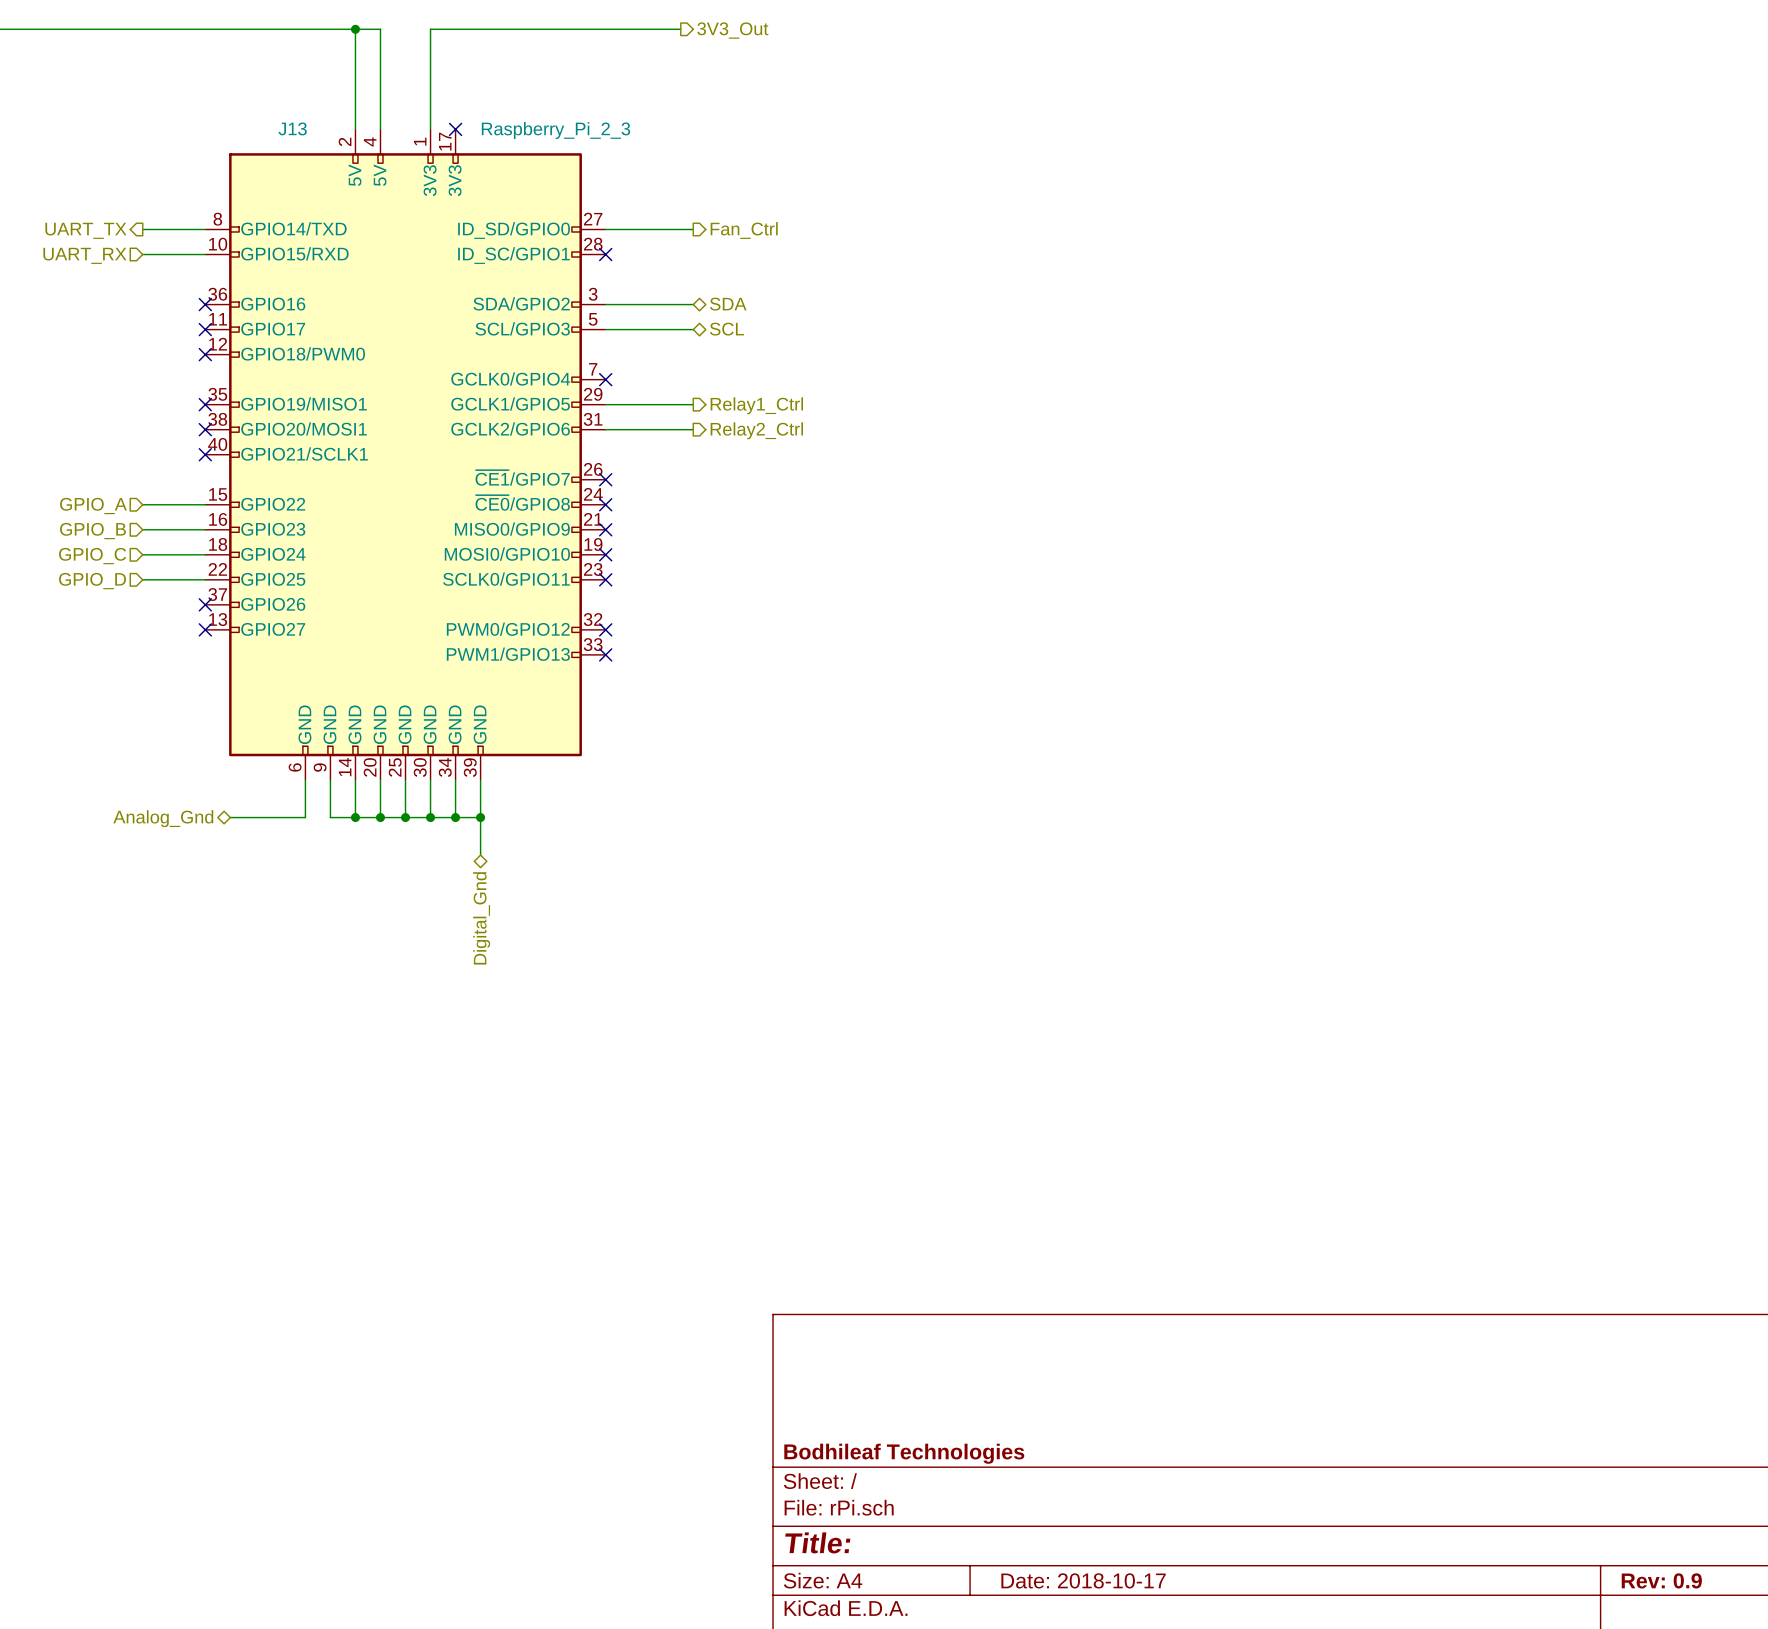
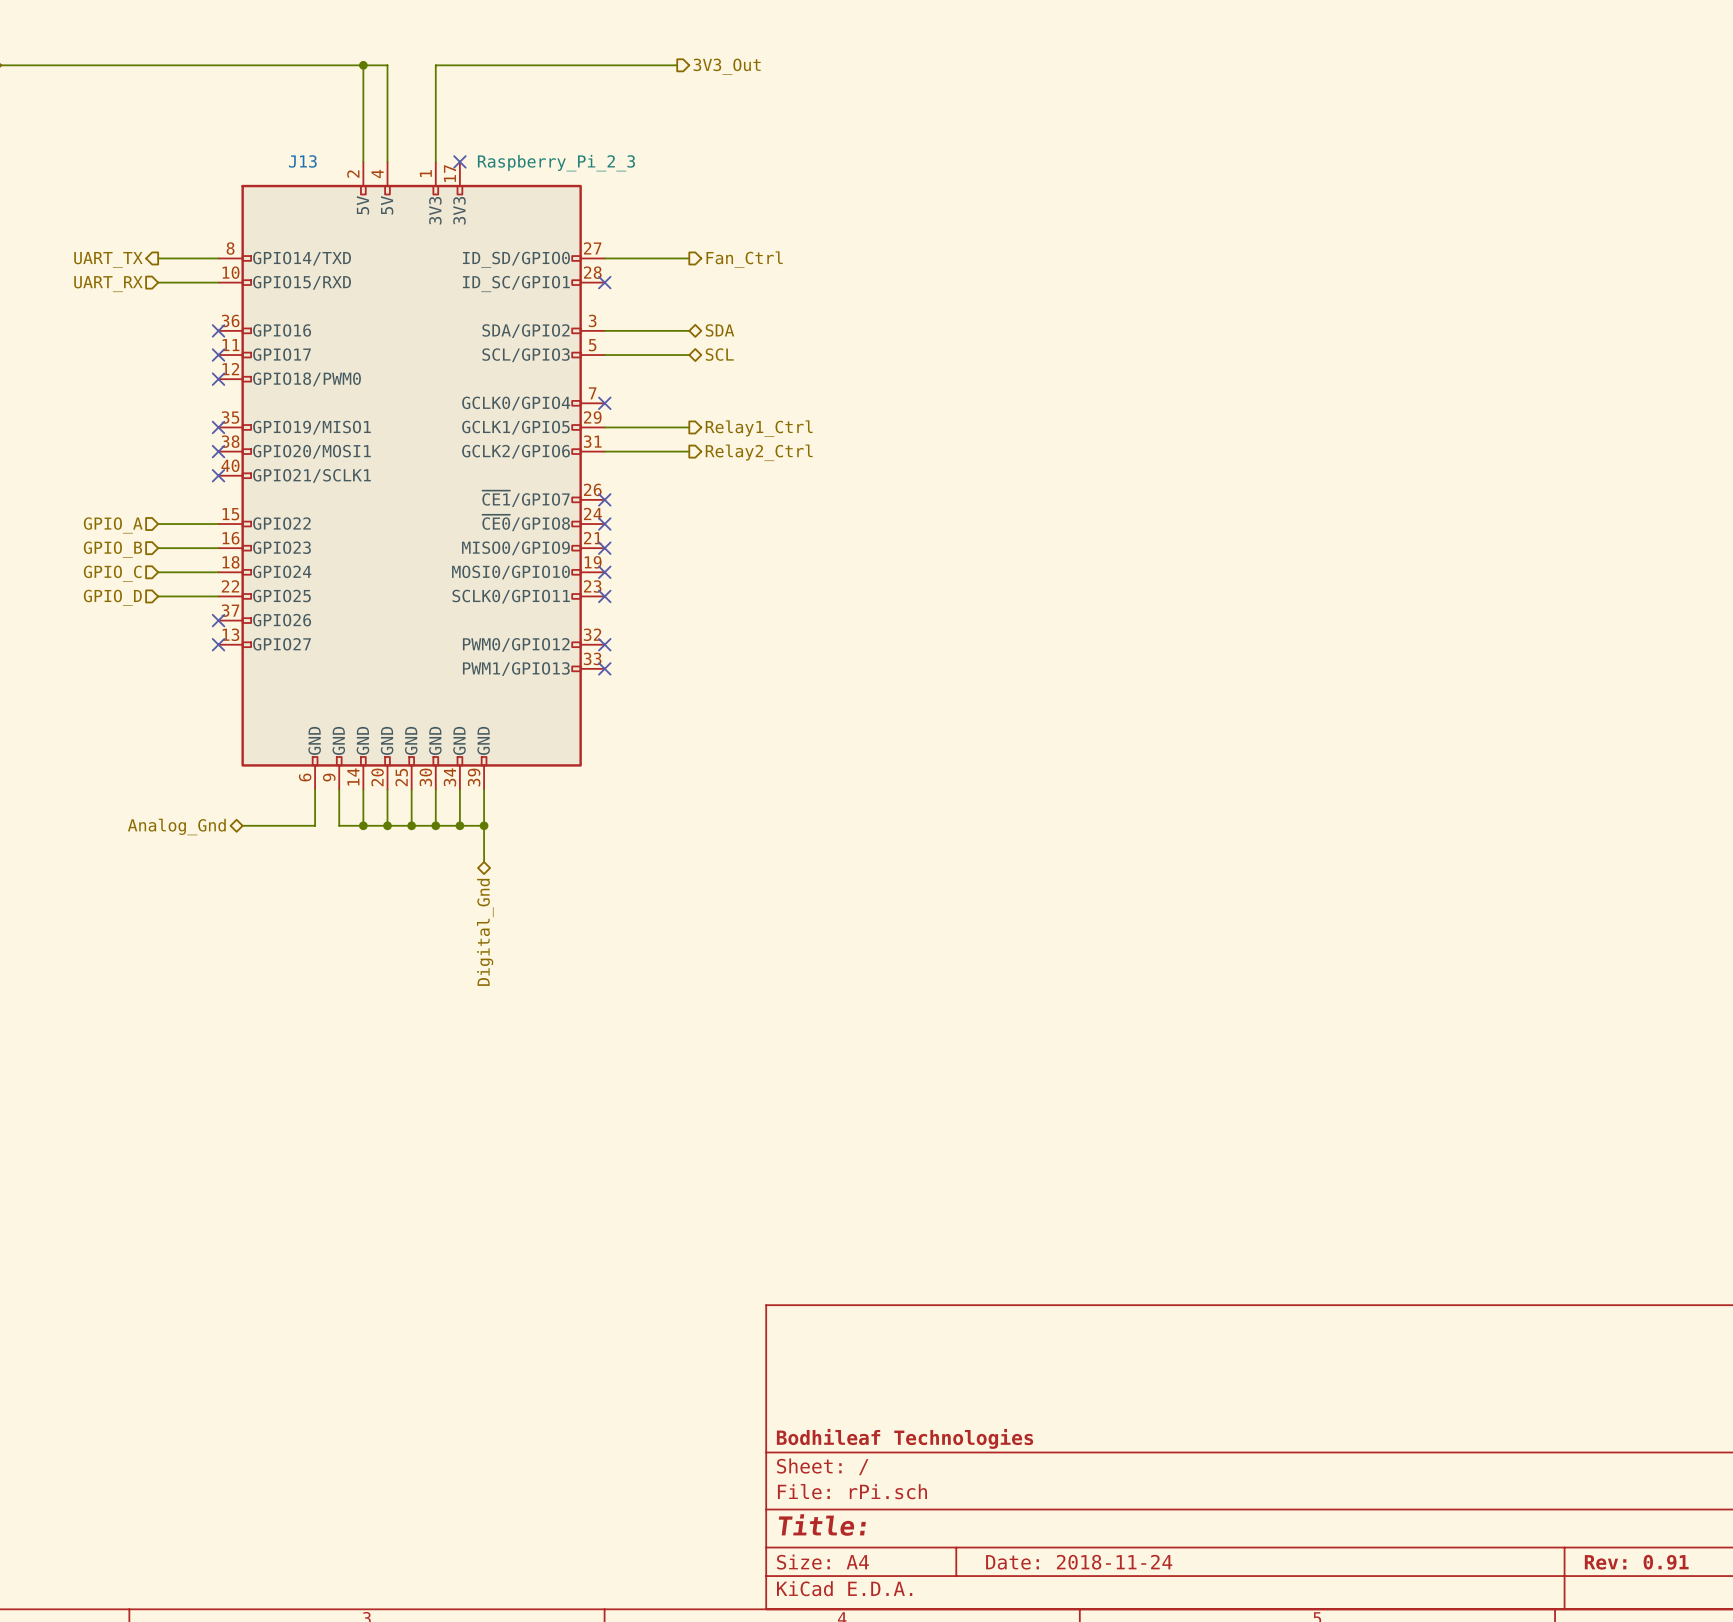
title block: Date: 2018-10-17 (1083, 1580) -> Date: 2018-11-24 (1079, 1562)
title block: Rev: 0.9 (1661, 1580) -> Rev: 0.91 (1636, 1562)

